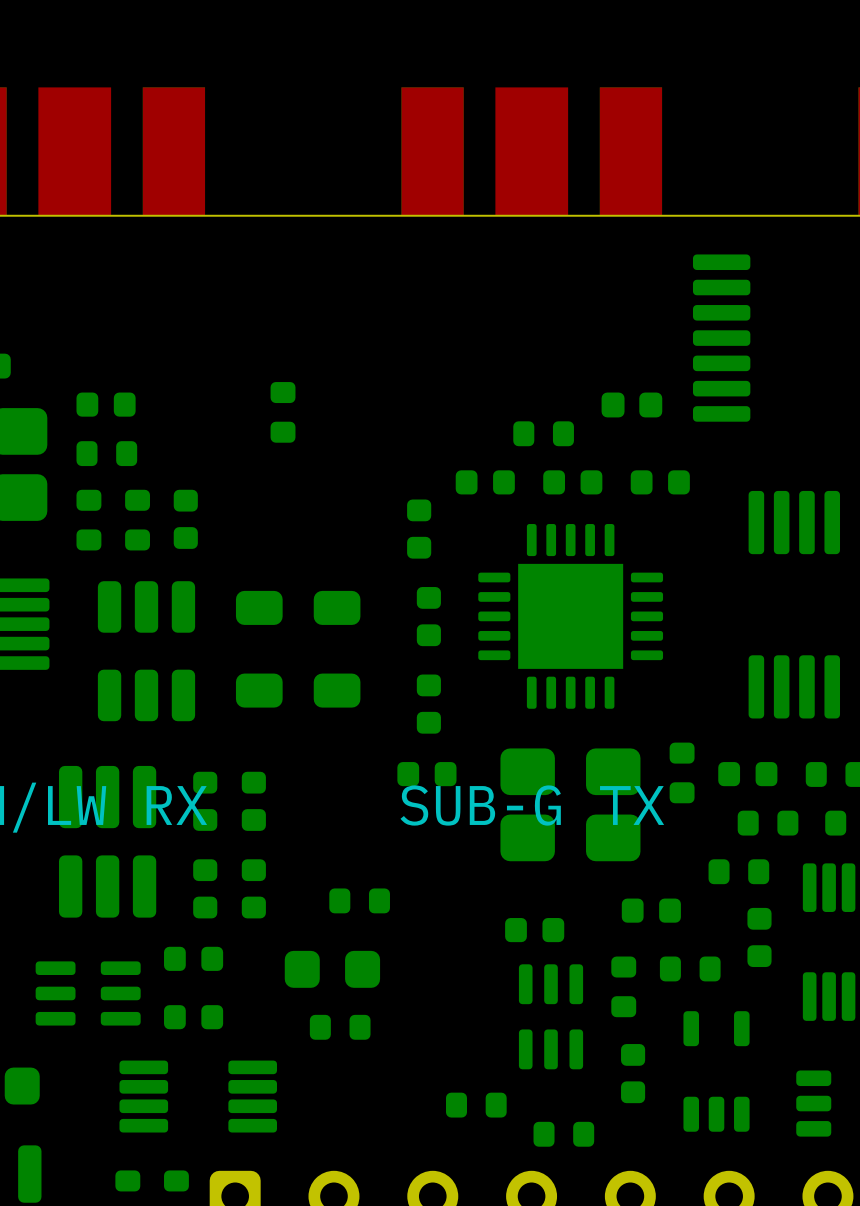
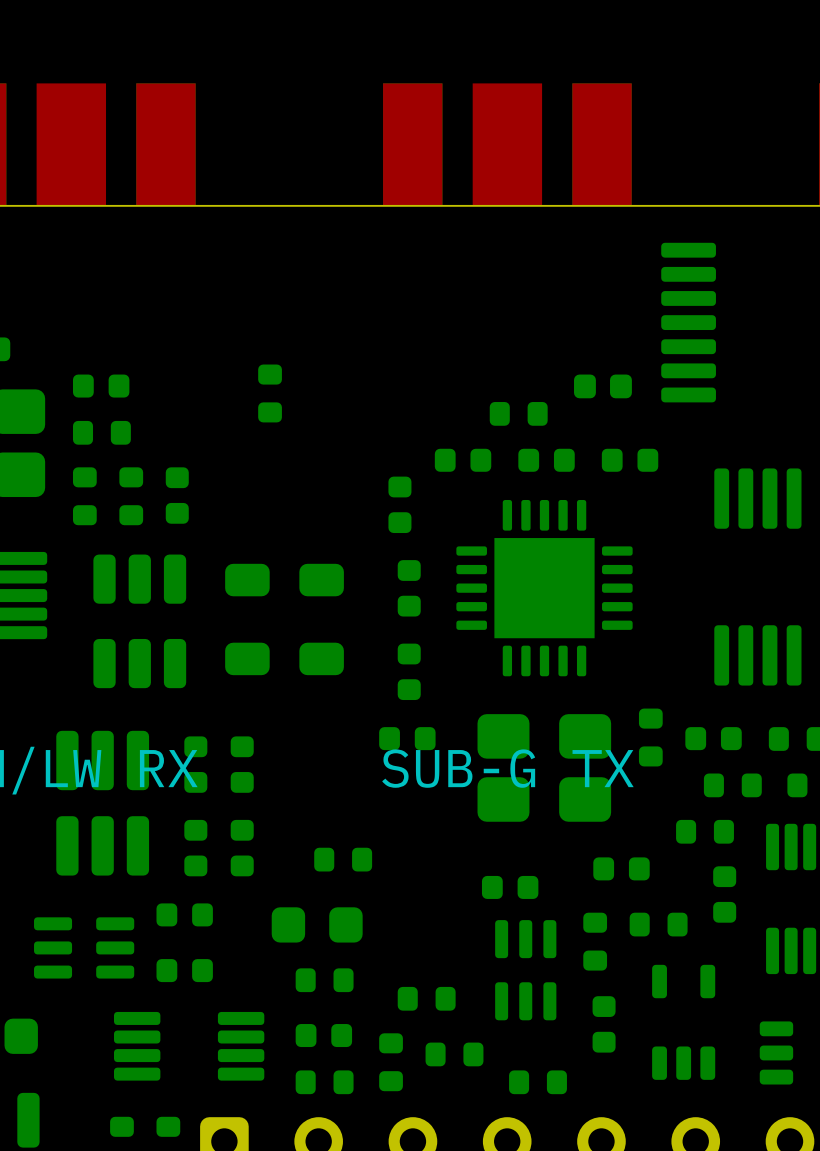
part: none -> (426, 998)
part: none -> (323, 1035)
part: none -> (391, 1062)
part: none -> (324, 1082)

